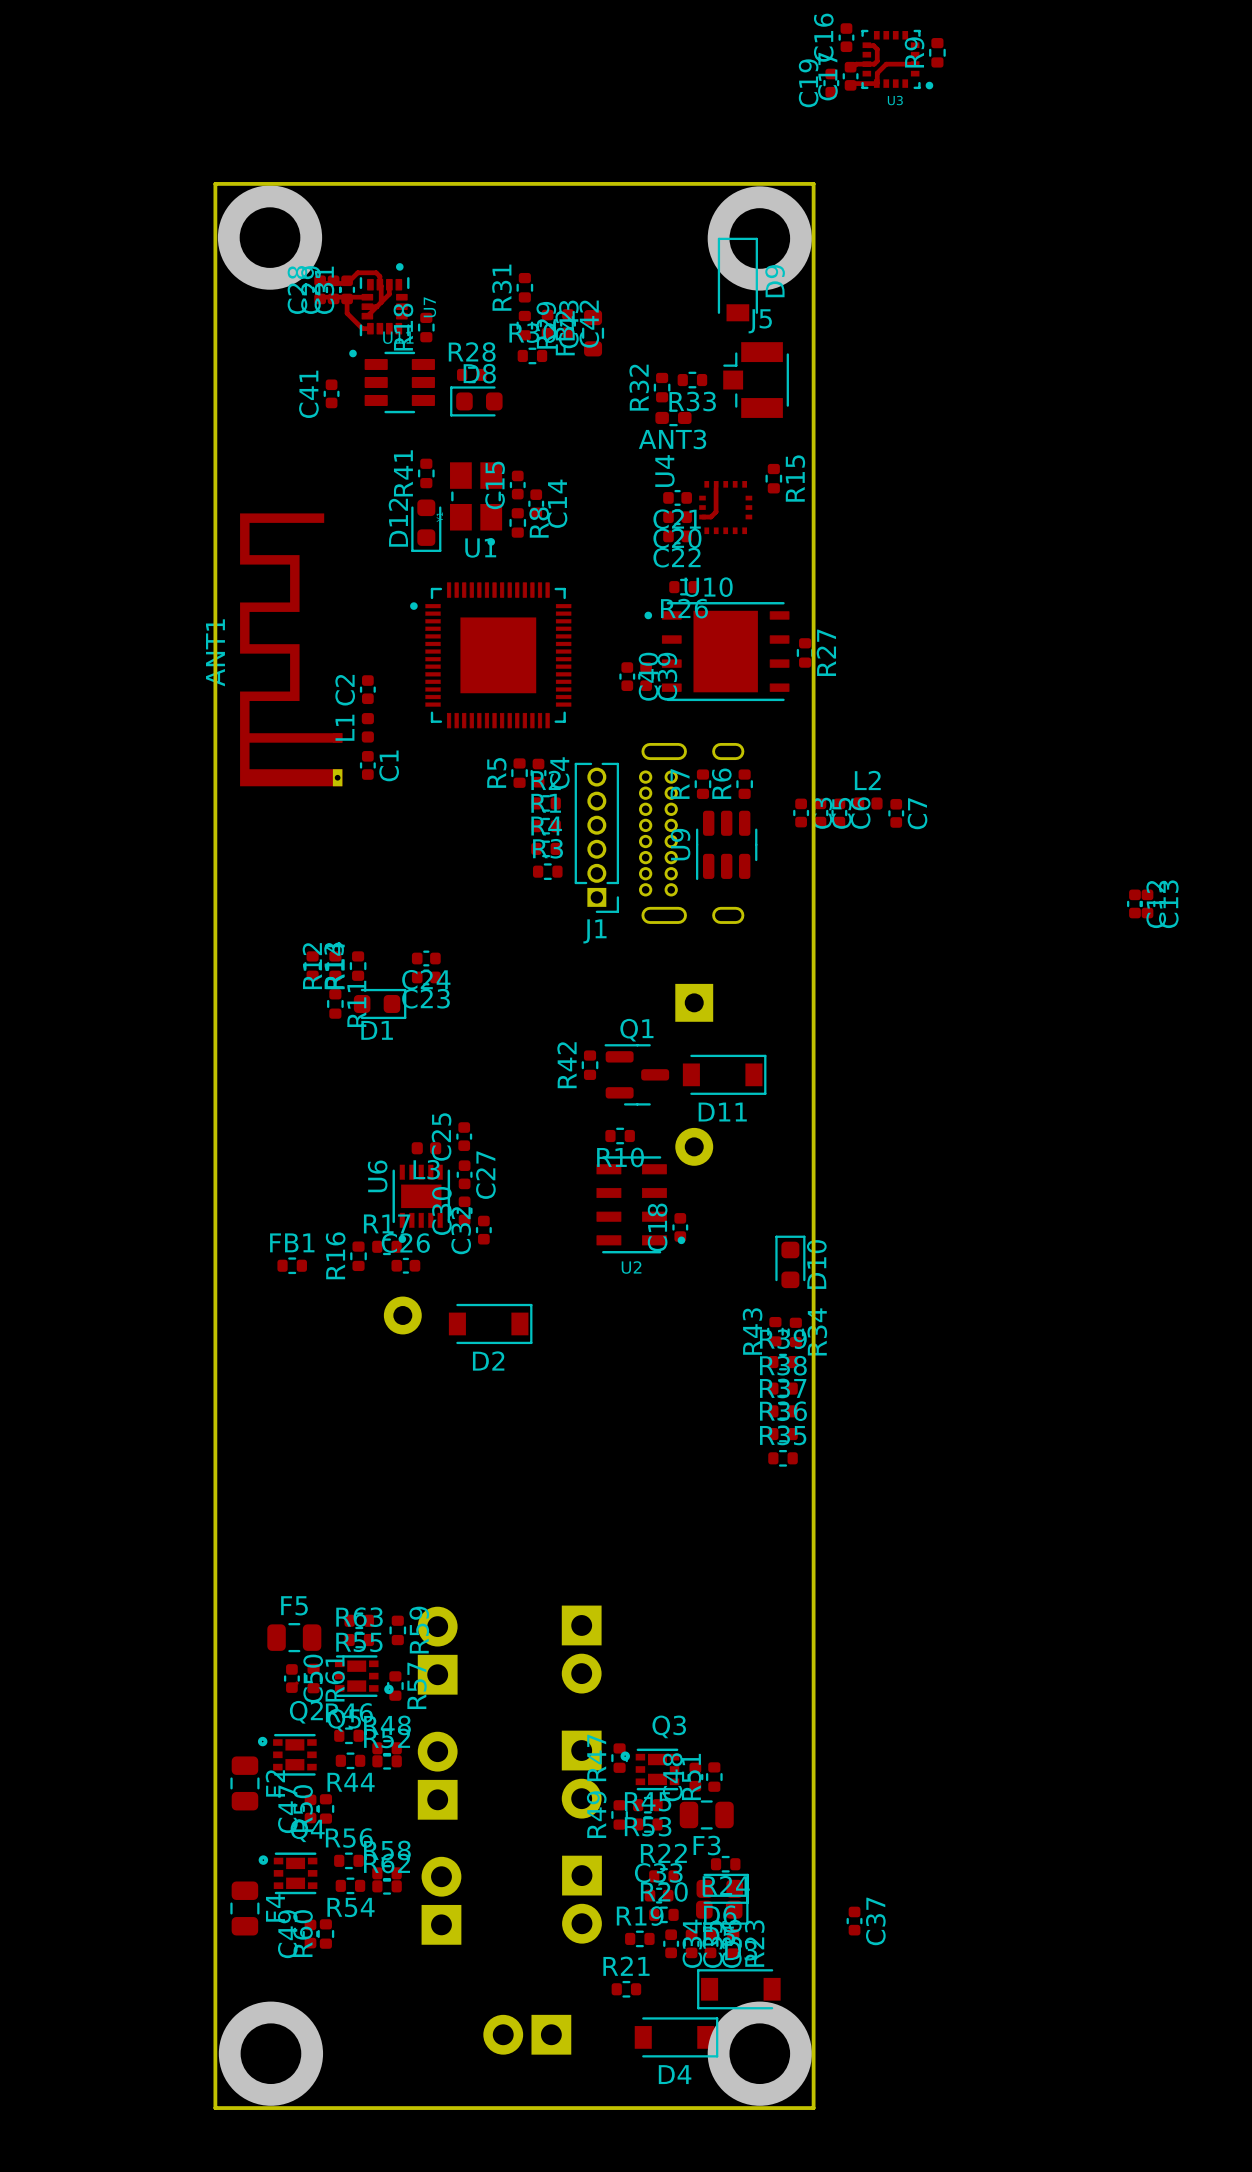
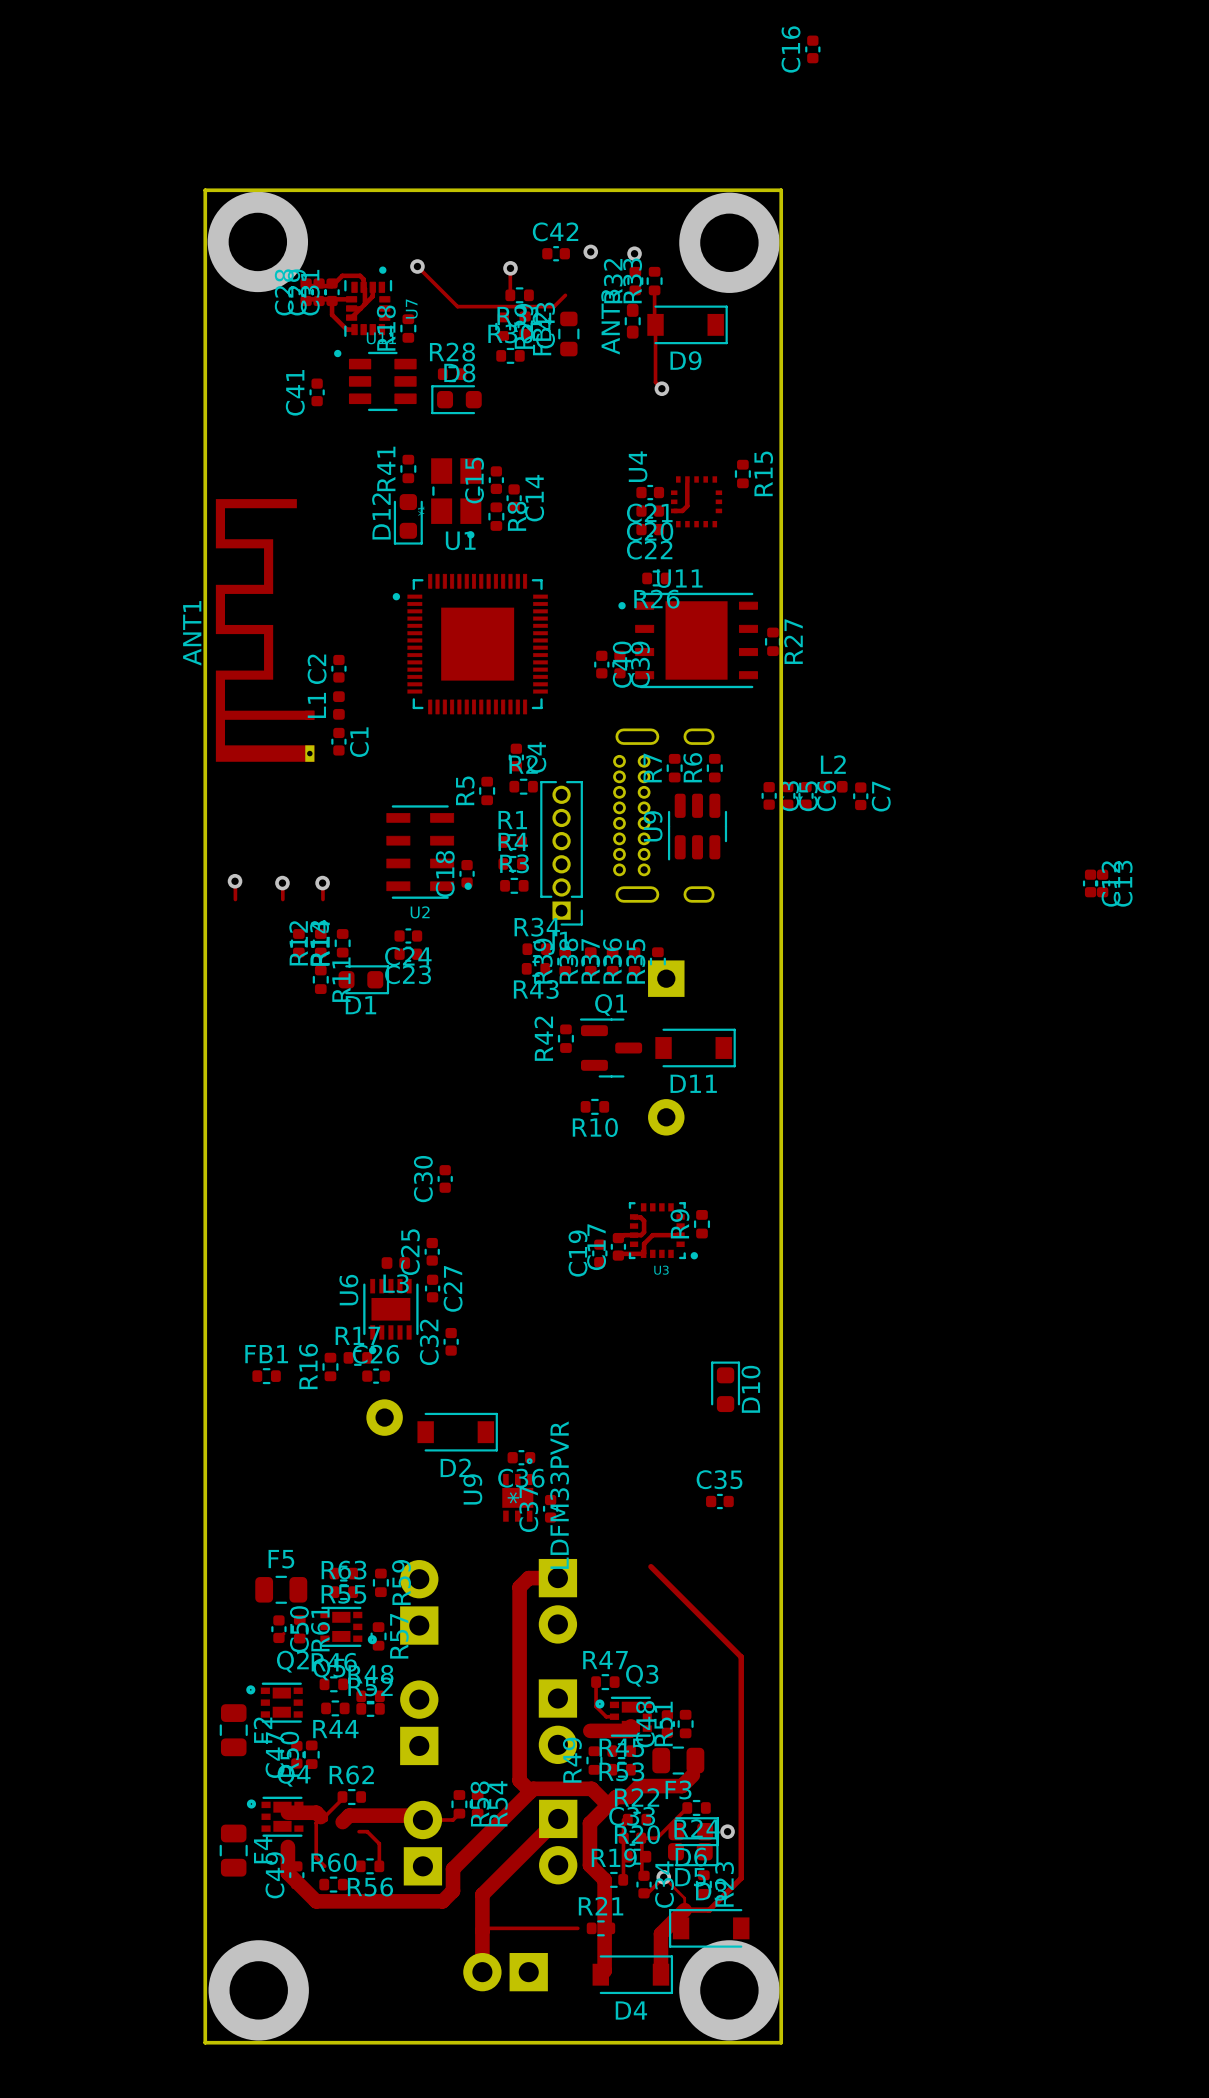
track: (866, 45) (873, 45) (877, 49) (877, 61) (874, 64) (856, 64) (850, 69) -> none
R9 position: (937, 52) -> (701, 1224)
U3 position: (897, 59) -> (663, 1230)
track: (915, 64) (886, 64) (877, 73) (876, 83) (850, 82) -> none
C17 position: (850, 76) -> (618, 1246)
C19 position: (831, 83) -> (599, 1253)
via: none -> (590, 251)
via: none -> (634, 253)
track: none -> (417, 266) (457, 306) (554, 306) (565, 295)
via: none -> (417, 266)
track: none -> (510, 268) (510, 295)
via: none -> (510, 268)
D9 rotation: 0° (737, 279) -> 90° clockwise (687, 324)
R31 rotation: 0° (524, 287) -> 90° clockwise (519, 295)
R31 position: (524, 287) -> (519, 295)
track: none -> (654, 290) (655, 382) (661, 388)
C42 rotation: 0° (568, 323) -> 90° clockwise (556, 253)
C42 position: (568, 323) -> (556, 253)
R33 rotation: 0° (692, 380) -> 90° clockwise (654, 281)
R33 position: (692, 380) -> (654, 281)
J5: (756, 380) -> none
R32 position: (662, 387) -> (635, 281)
via: none -> (661, 388)
ANT3 rotation: 0° (673, 417) -> 90° clockwise (632, 321)
ANT3 position: (673, 417) -> (632, 321)
U10 name: U10 (708, 587) -> U11 (679, 578)
ANT1 position: (291, 649) -> (265, 630)
C2 position: (367, 689) -> (338, 668)
L1 position: (367, 727) -> (338, 705)
C1 position: (367, 765) -> (338, 741)
R5 position: (519, 773) -> (487, 790)
R1 position: (546, 826) -> (512, 842)
J1 position: (596, 837) -> (561, 853)
R4 position: (546, 848) -> (512, 863)
R3 position: (547, 871) -> (514, 885)
track: none -> (235, 881) (235, 899)
via: none -> (235, 881)
track: none -> (282, 883) (282, 899)
via: none -> (282, 883)
track: none -> (322, 883) (322, 899)
via: none -> (322, 883)
C25 position: (464, 1136) -> (432, 1251)
L3 position: (426, 1148) -> (395, 1263)
C27 position: (464, 1174) -> (432, 1288)
U6 position: (421, 1203) -> (390, 1316)
U2 position: (640, 1204) -> (429, 852)
C18 position: (680, 1227) -> (467, 873)
C32 position: (483, 1230) -> (451, 1341)
R17 position: (386, 1246) -> (357, 1357)
track: none -> (634, 1216) (640, 1217) (644, 1220) (644, 1232) (641, 1235) (623, 1235) (618, 1240)
R16 position: (358, 1256) -> (330, 1367)
D10 position: (790, 1261) -> (725, 1386)
FB1 position: (292, 1265) -> (266, 1376)
C26 position: (405, 1265) -> (376, 1376)
track: none -> (680, 1235) (652, 1235) (644, 1243) (643, 1253) (618, 1252)
part position: (402, 1315) -> (384, 1417)
D2 position: (490, 1323) -> (457, 1432)
R43 rotation: 0° (775, 1331) -> 90° clockwise (536, 968)
R43 position: (775, 1331) -> (536, 968)
R34 rotation: 0° (795, 1332) -> 90° clockwise (536, 949)
R34 position: (795, 1332) -> (536, 949)
R39 rotation: 0° (783, 1362) -> 90° clockwise (565, 961)
R39 position: (783, 1362) -> (565, 961)
R38 rotation: 0° (783, 1388) -> 90° clockwise (590, 961)
R38 position: (783, 1388) -> (590, 961)
R37 rotation: 0° (783, 1411) -> 90° clockwise (612, 961)
R37 position: (783, 1411) -> (612, 961)
R36 rotation: 0° (783, 1434) -> 90° clockwise (634, 961)
R36 position: (783, 1434) -> (634, 961)
R35 rotation: 0° (783, 1458) -> 90° clockwise (657, 961)
R35 position: (783, 1458) -> (657, 961)
U9: none -> LDFM33PVR (517, 1489)
track: none -> (650, 1566) (741, 1657) (741, 1878) (709, 1910) (684, 1910)
track: none -> (557, 1578) (528, 1578) (519, 1587) (519, 1780) (530, 1791)
track: none -> (596, 1682) (596, 1706) (606, 1716) (614, 1716)
R47 rotation: 0° (619, 1758) -> 90° clockwise (605, 1682)
R47 position: (619, 1758) -> (605, 1682)
track: none -> (630, 1726) (629, 1730) (590, 1730)
track: none -> (692, 1775) (681, 1786) (639, 1786) (628, 1797) (616, 1797) (589, 1823) (589, 1865) (604, 1879) (604, 1970) (600, 1974)
R56 name position: R56 (349, 1837) -> R56 (370, 1887)
track: none -> (342, 1799) (326, 1815) (326, 1819) (319, 1819) (316, 1823) (316, 1857) (324, 1866)
R56 position: (348, 1860) -> (370, 1866)
track: none -> (608, 1805) (591, 1788) (533, 1788) (453, 1869) (453, 1890) (442, 1901) (316, 1901) (287, 1873) (287, 1846)
track: none -> (687, 1807) (657, 1838) (641, 1838) (641, 1875)
track: none -> (287, 1812) (316, 1812) (320, 1817)
track: none -> (459, 1813) (453, 1820) (422, 1820) (418, 1815) (349, 1815) (342, 1822)
R58 rotation: 0° (387, 1873) -> 90° clockwise (459, 1804)
R58 position: (387, 1873) -> (459, 1804)
track: none -> (558, 1818) (482, 1894) (482, 1972)
track: none -> (623, 1819) (623, 1879)
R54 rotation: 0° (350, 1885) -> 90° clockwise (477, 1804)
R54 position: (350, 1885) -> (477, 1804)
R62 position: (387, 1886) -> (351, 1797)
track: none -> (359, 1831) (367, 1831) (379, 1843) (379, 1866)
via: none -> (727, 1831)
C37 position: (854, 1921) -> (550, 1508)
C37 name position: C37 (875, 1921) -> C37 (528, 1509)
R60 rotation: 0° (325, 1934) -> 90° clockwise (333, 1884)
R60 position: (325, 1934) -> (333, 1884)
via: none -> (663, 1877)
C35 rotation: 0° (691, 1943) -> 90° clockwise (719, 1501)
C35 position: (691, 1943) -> (719, 1501)
C36 rotation: 0° (710, 1943) -> 90° clockwise (521, 1457)
C36 position: (710, 1943) -> (521, 1457)
track: none -> (641, 1893) (647, 1893) (663, 1877) (684, 1898) (684, 1910)
track: none -> (684, 1910) (660, 1933) (660, 1974)
track: none -> (577, 1928) (484, 1928) (482, 1930)
D4 position: (676, 2037) -> (632, 1974)

